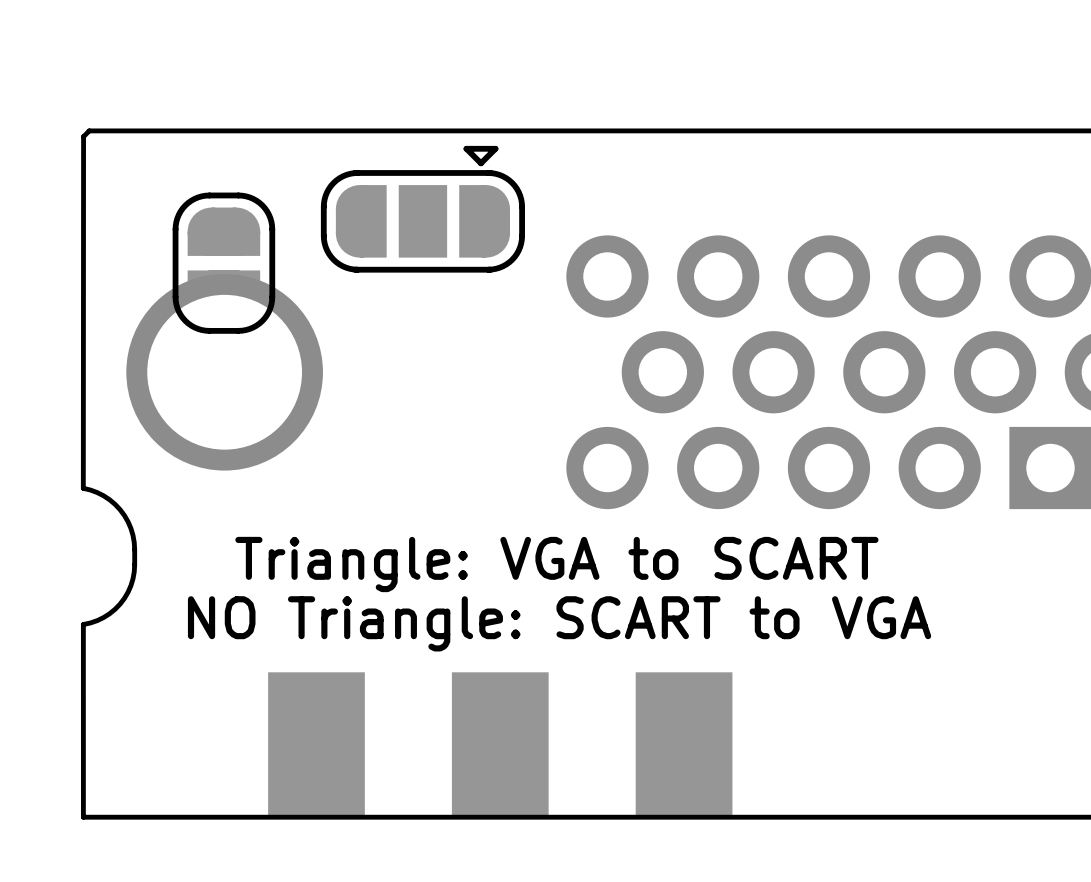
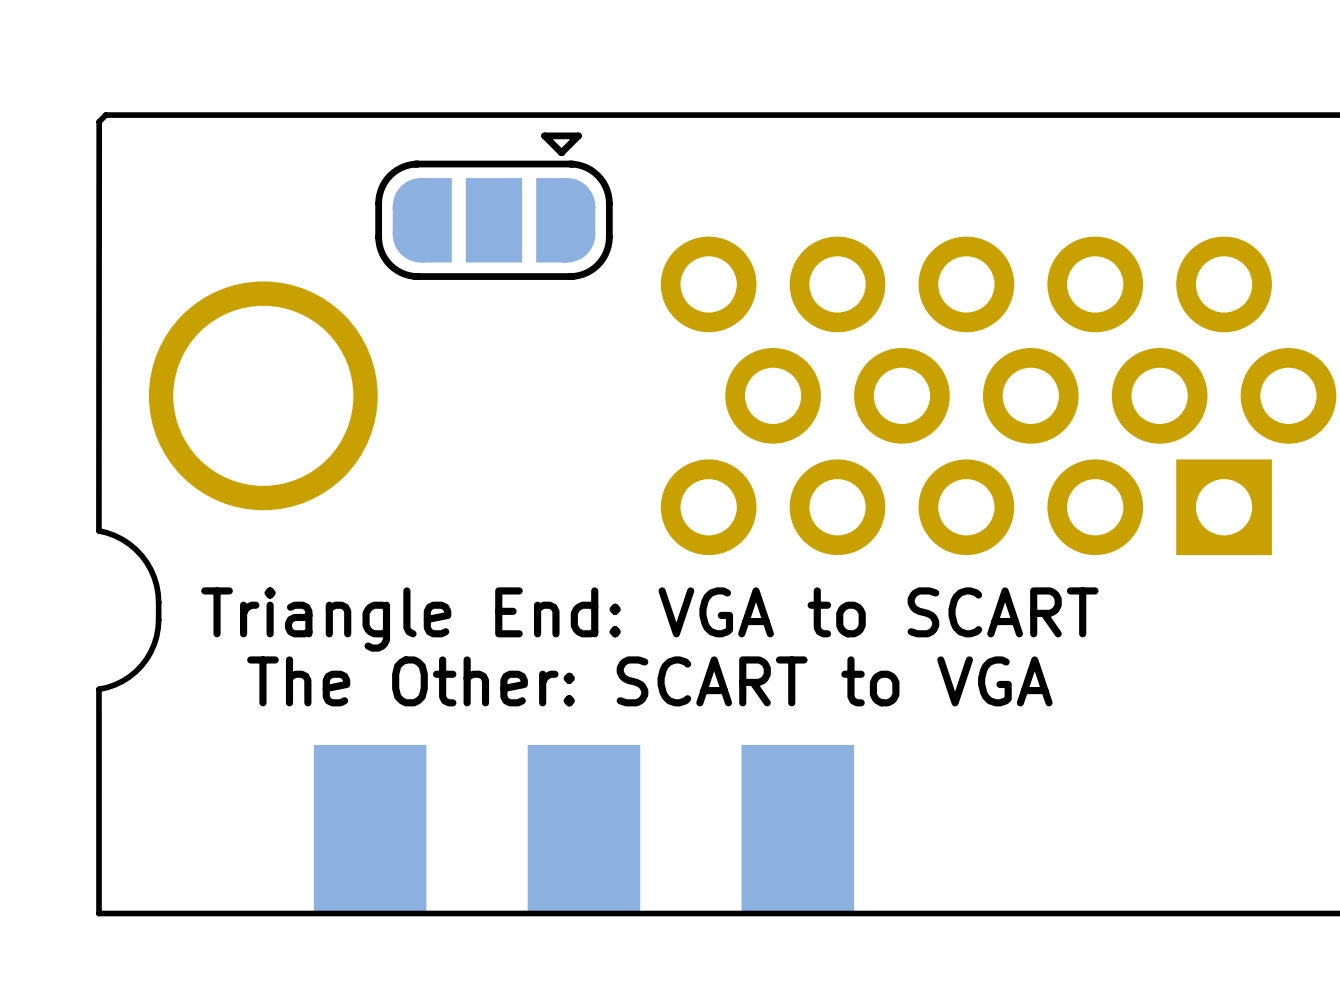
part: (223, 263) -> none
text: Triangle: VGA to SCART (556, 564) -> Triangle End: VGA to SCART (649, 619)
text: NO Triangle: SCART to VGA (559, 623) -> The Other: SCART to VGA (649, 681)

